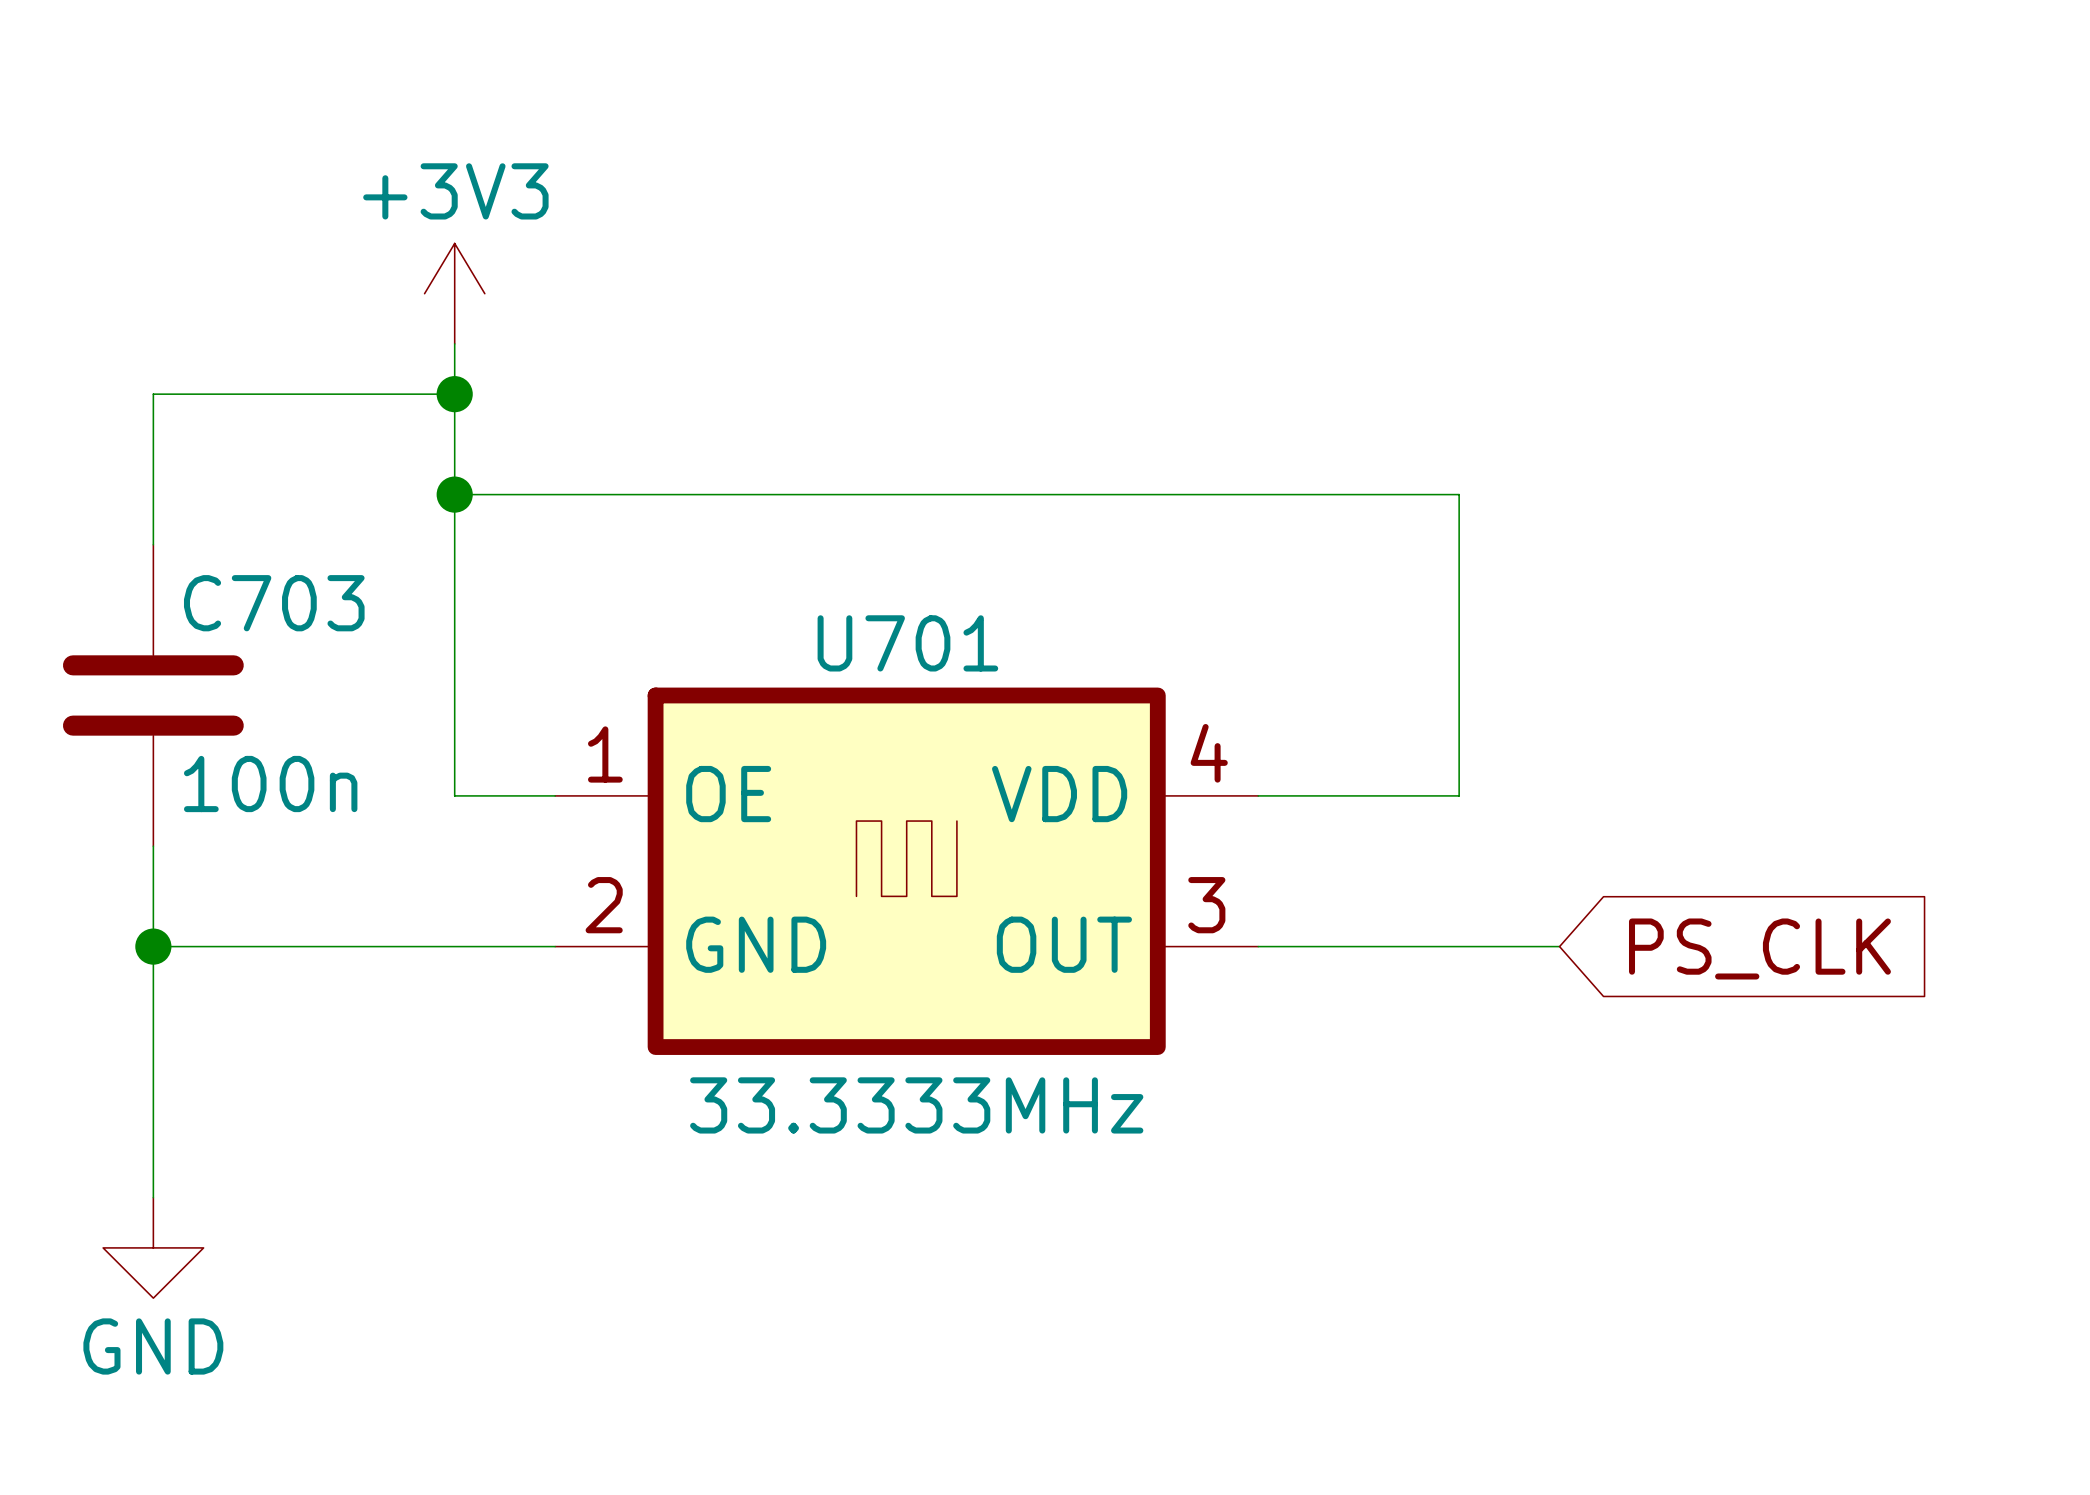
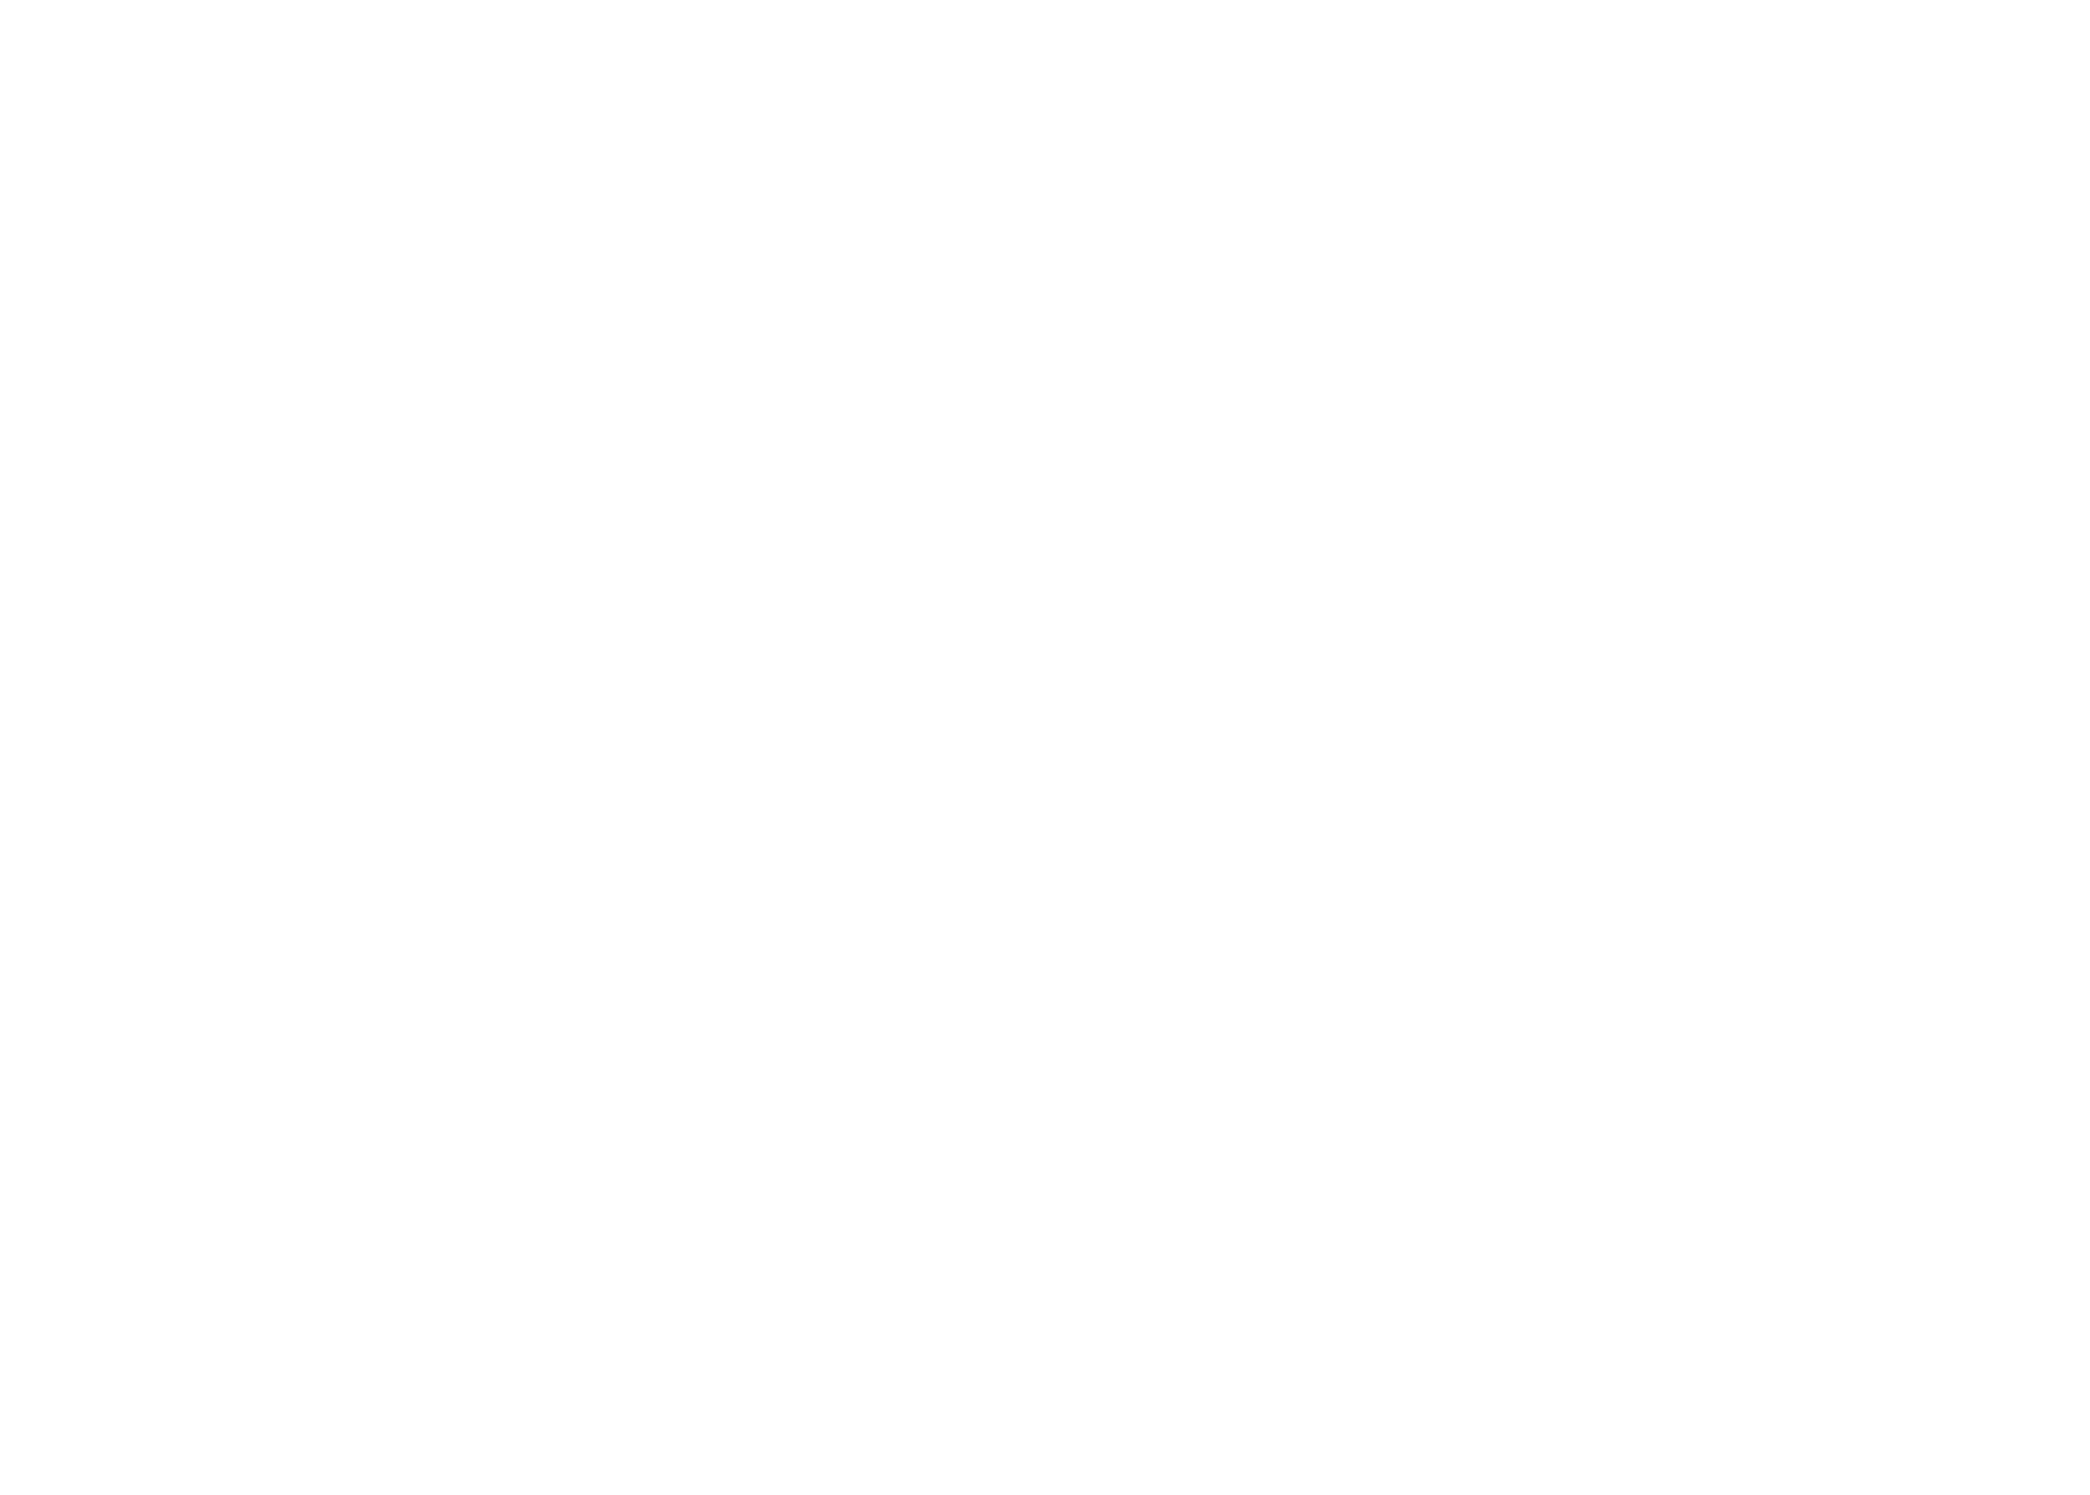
power symbol: +3V3 (454, 293) -> none
wire: (454, 343) (454, 795) (555, 795) -> none
wire: (454, 394) (153, 394) (153, 544) -> none
junction: (454, 394) -> none
wire: (454, 494) (1459, 494) (1459, 795) (1258, 795) -> none
junction: (454, 494) -> none
C703: 100n (153, 695) -> none
wire: (153, 846) (153, 1197) -> none
U701: 33.3333MHz (906, 871) -> none
wire: (153, 946) (555, 946) -> none
junction: (153, 946) -> none
wire: (1258, 946) (1559, 946) -> none
global label: PS_CLK (1759, 948) -> none
power symbol: GND (153, 1247) -> none

